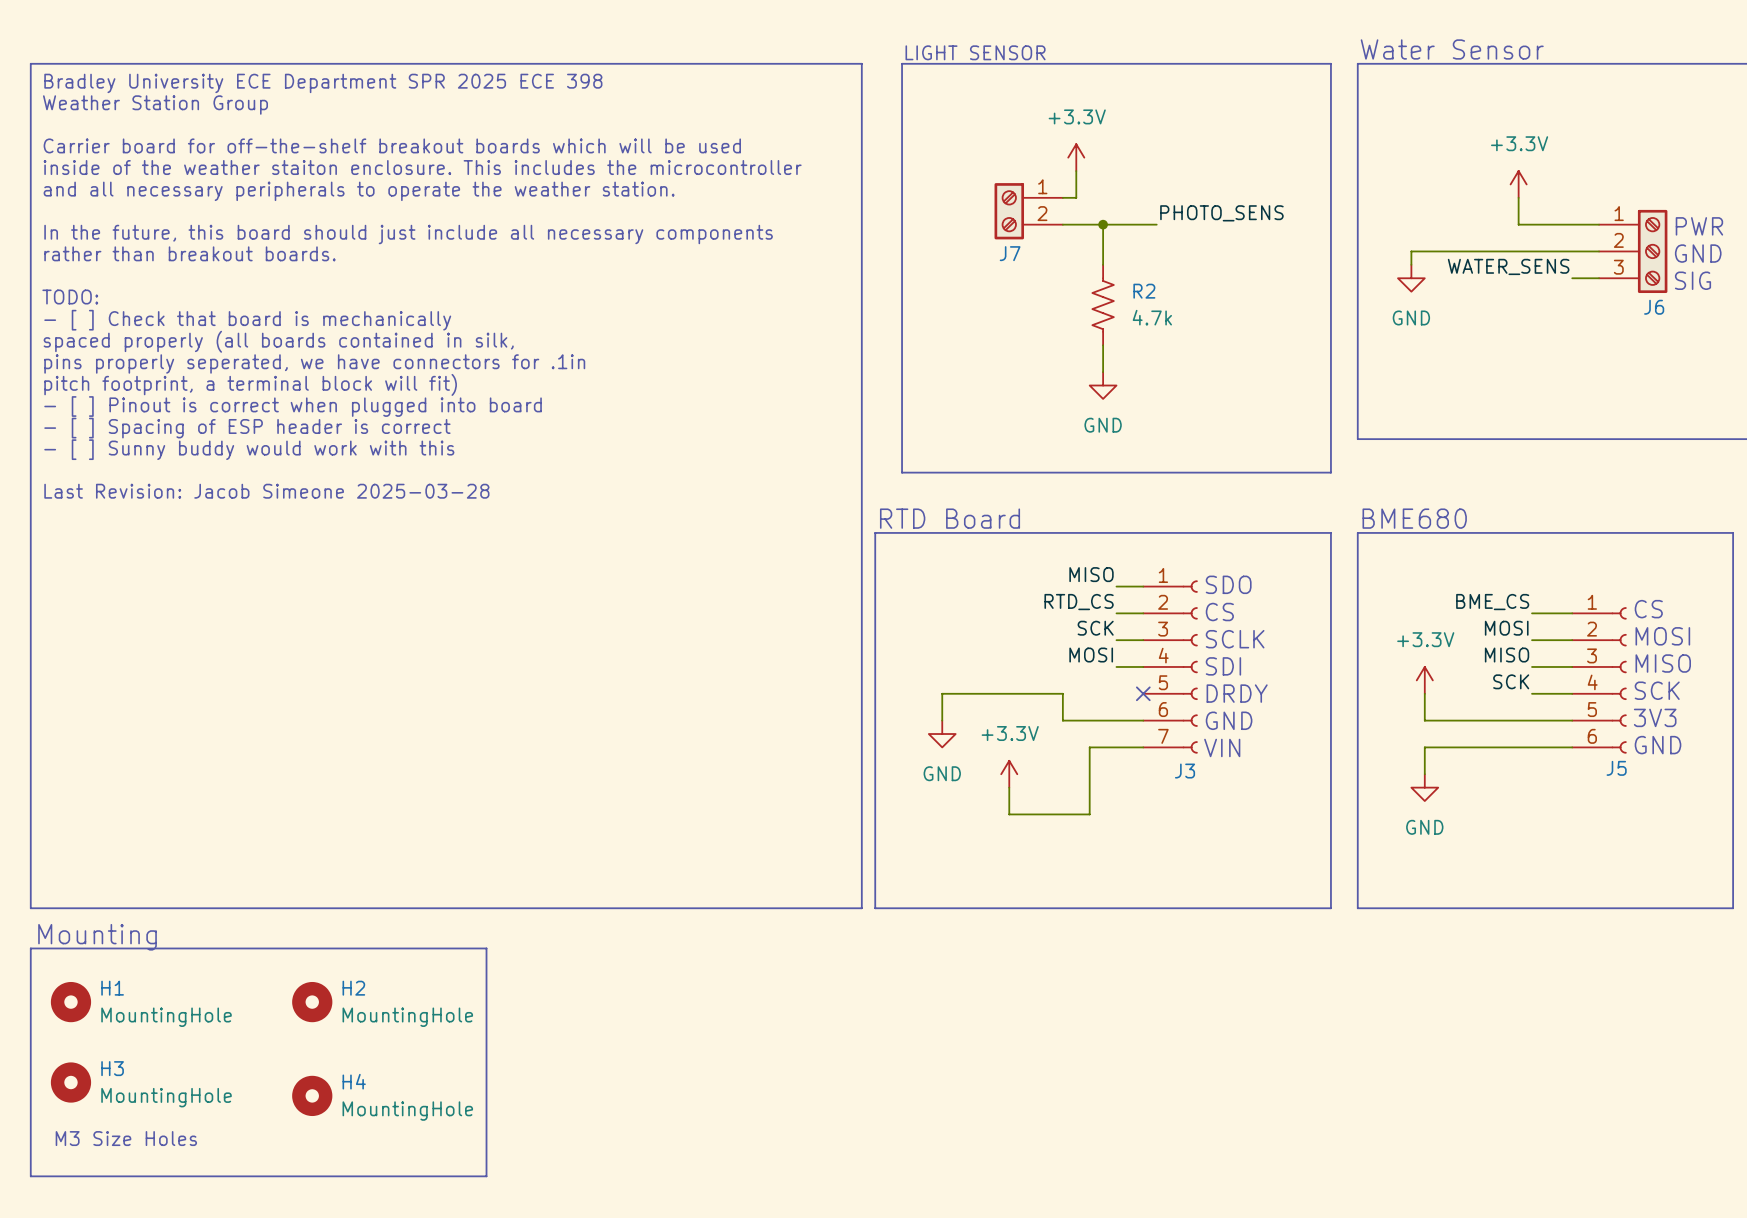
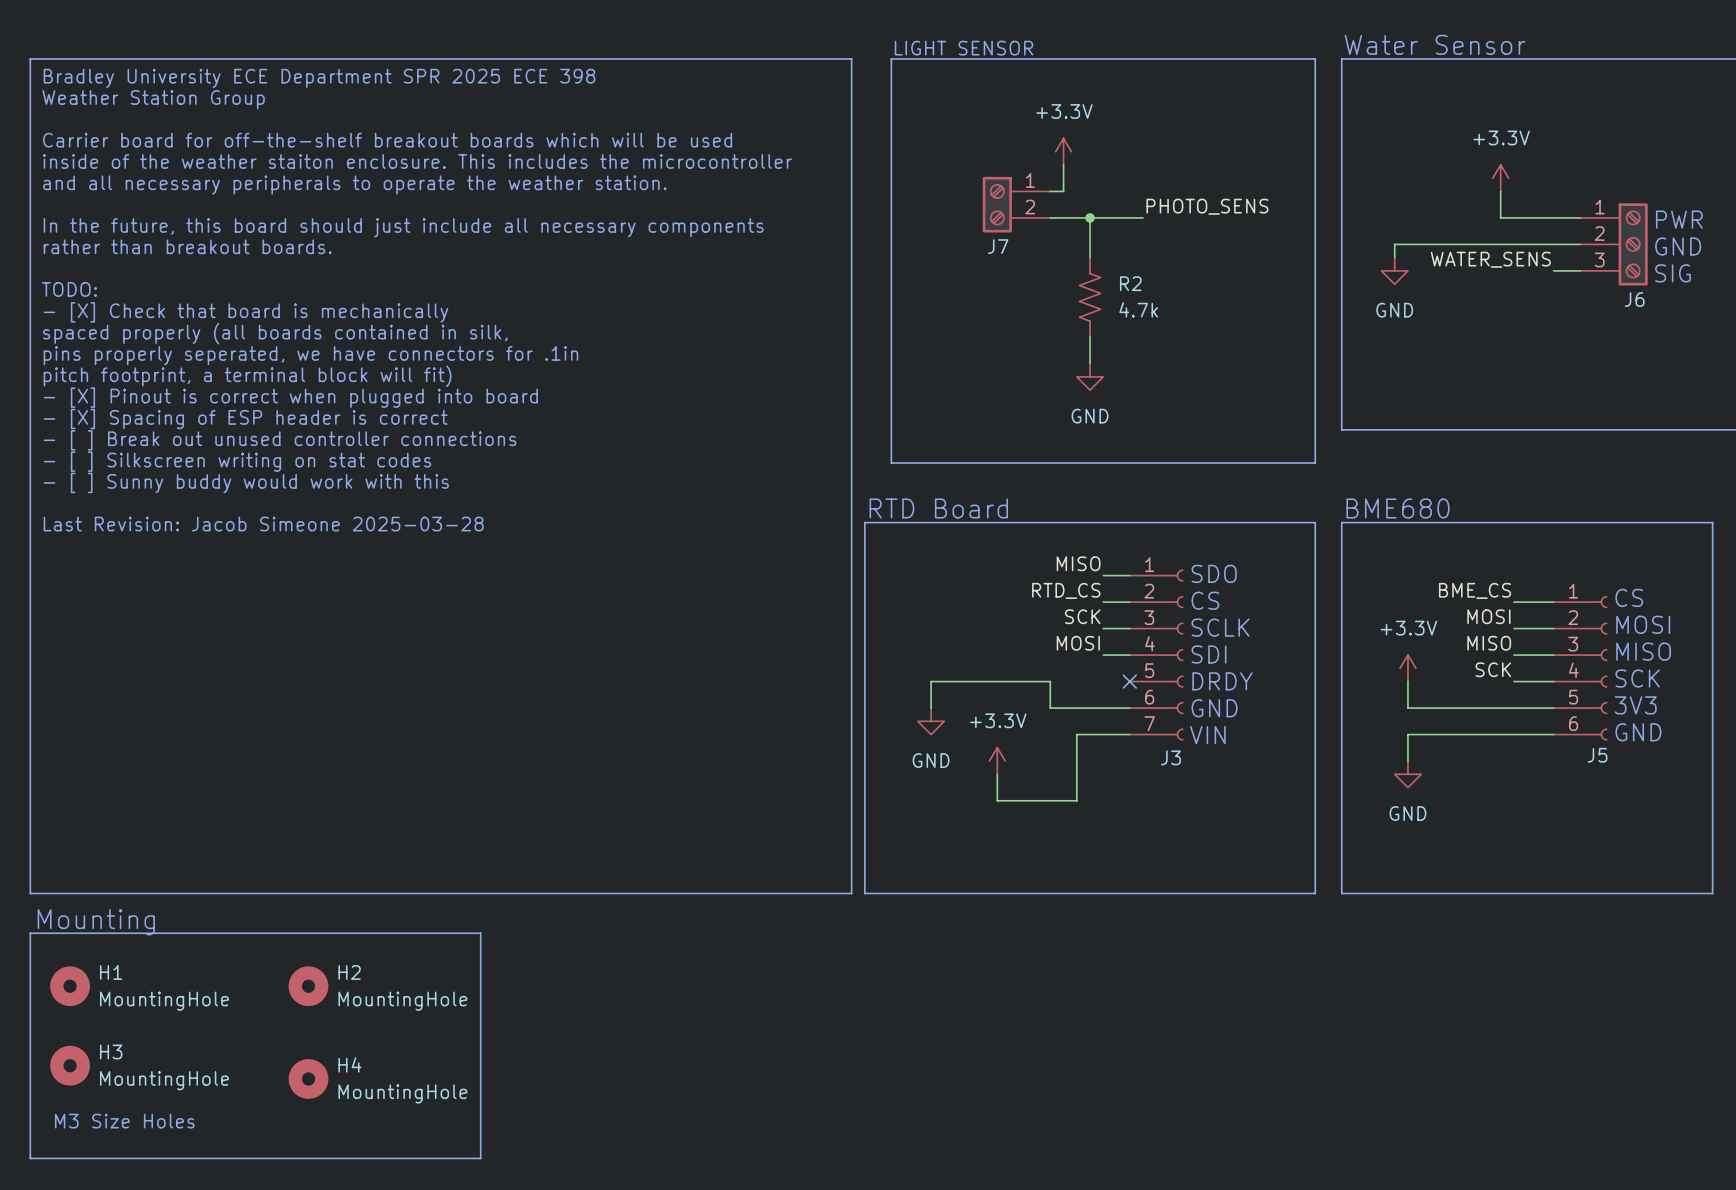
text: - [ ] Check that board is mechanically (247, 320) -> - [X] Check that board is mechanically (245, 312)
text: - [ ] Pinout is correct when plugged into board (293, 406) -> - [X] Pinout is correct when plugged into board (290, 397)
text: - [ ] Spacing of ESP header is correct (247, 428) -> - [X] Spacing of ESP header is correct (245, 418)
text: - [ ] Sunny buddy would work with this (249, 449) -> - [ ] Break out unused controller connections (280, 440)
text: none -> - [ ] Silkscreen writing on stat codes (237, 461)
text: Last Revision: Jacob Simeone 2025-03-28 (266, 491) -> - [ ] Sunny buddy would work with this (246, 482)
text: none -> Last Revision: Jacob Simeone 2025-03-28 (263, 524)

